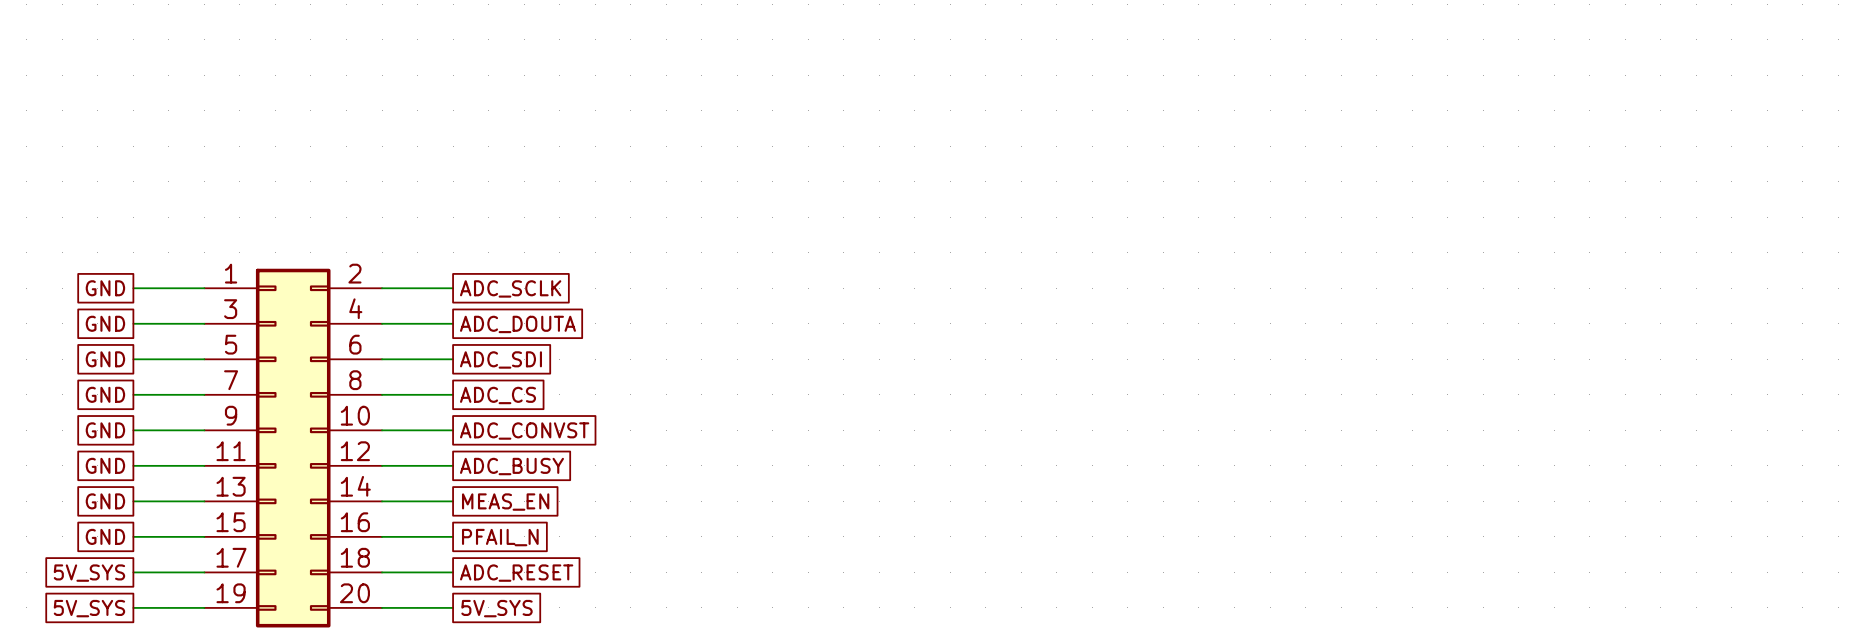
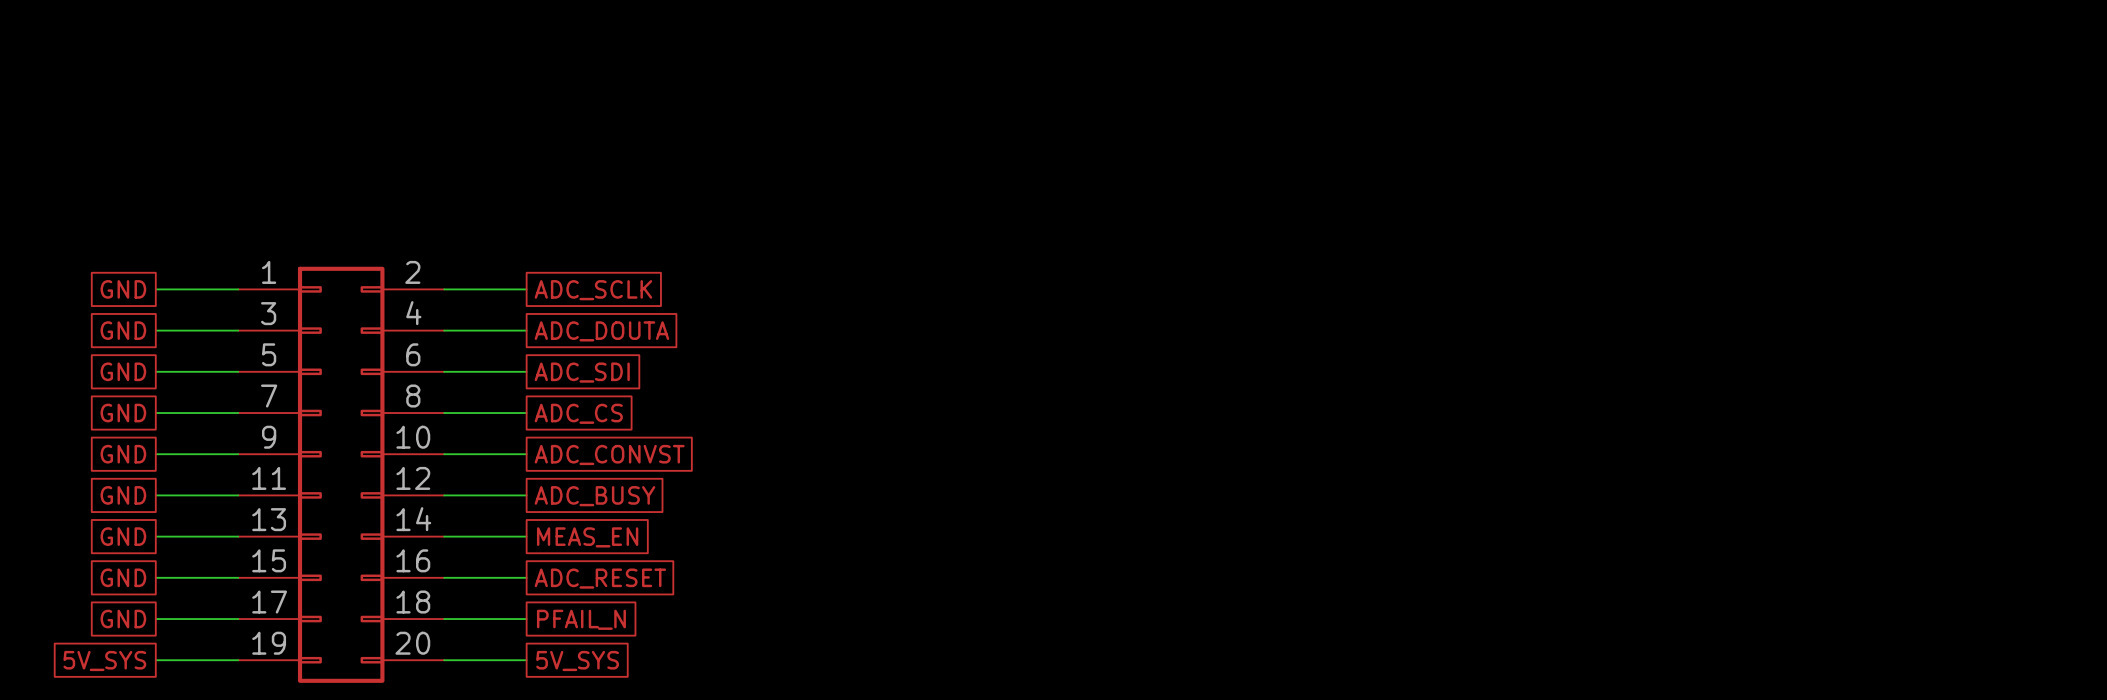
global label: PFAIL_N (500, 537) -> ADC_RESET (600, 578)
global label: 5V_SYS (89, 573) -> GND (123, 619)
global label: ADC_RESET (516, 573) -> PFAIL_N (581, 619)

